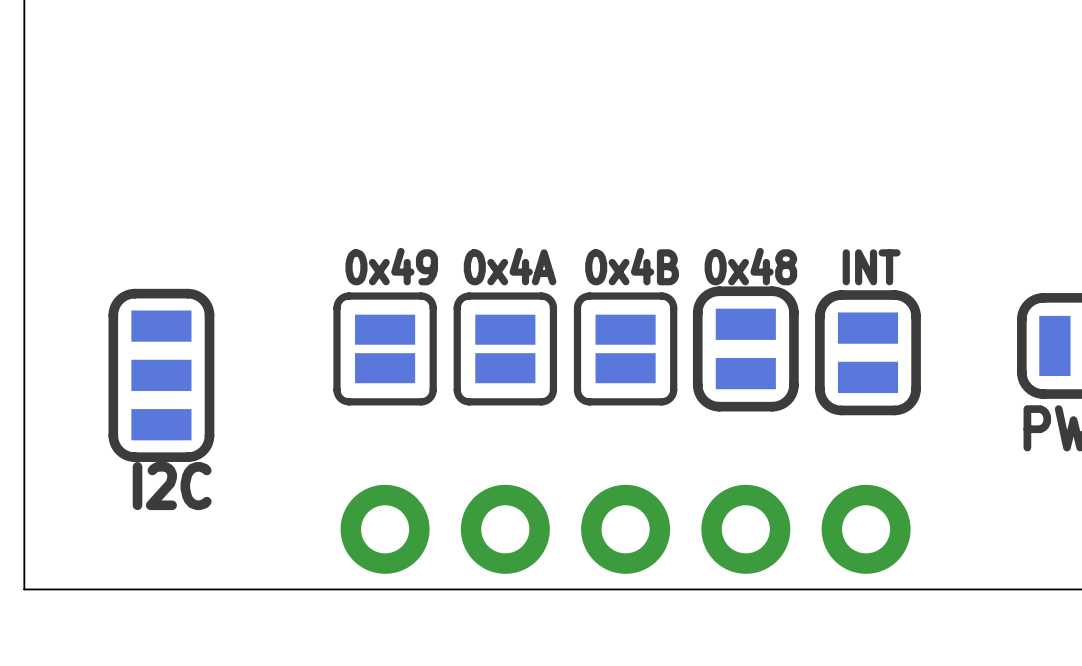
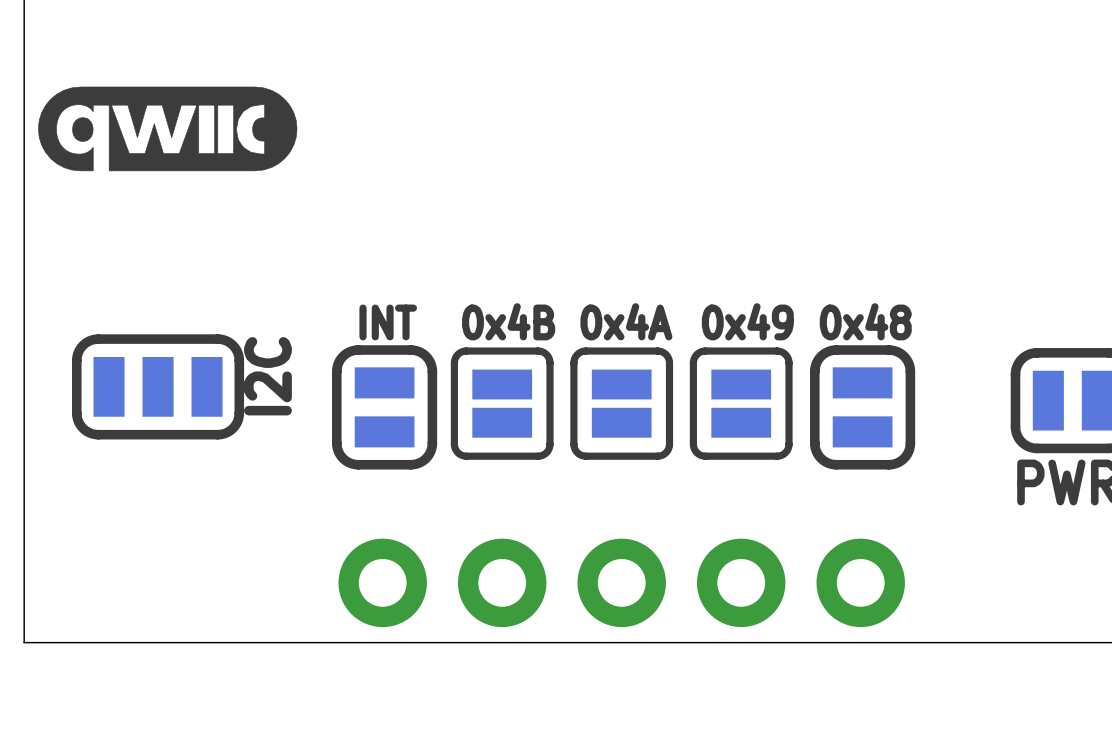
drawing: none -> [38, 86, 298, 172]
text: 0x49 (391, 266) -> INT (388, 322)
text: 0x4A (510, 266) -> 0x4B (508, 321)
text: 0x4B (632, 266) -> 0x4A (626, 321)
text: 0x48 (750, 266) -> 0x49 (747, 321)
text: INT (871, 267) -> 0x48 (865, 321)
part footprint: [692, 286, 799, 412] -> [689, 347, 793, 460]
part footprint: [333, 292, 437, 406] -> [332, 345, 438, 470]
part rotation: 0° (161, 375) -> 90° clockwise (158, 386)
text rotation: 0° (172, 486) -> 90° counterclockwise (267, 376)
text position: I2C (172, 486) -> I2C (267, 376)

